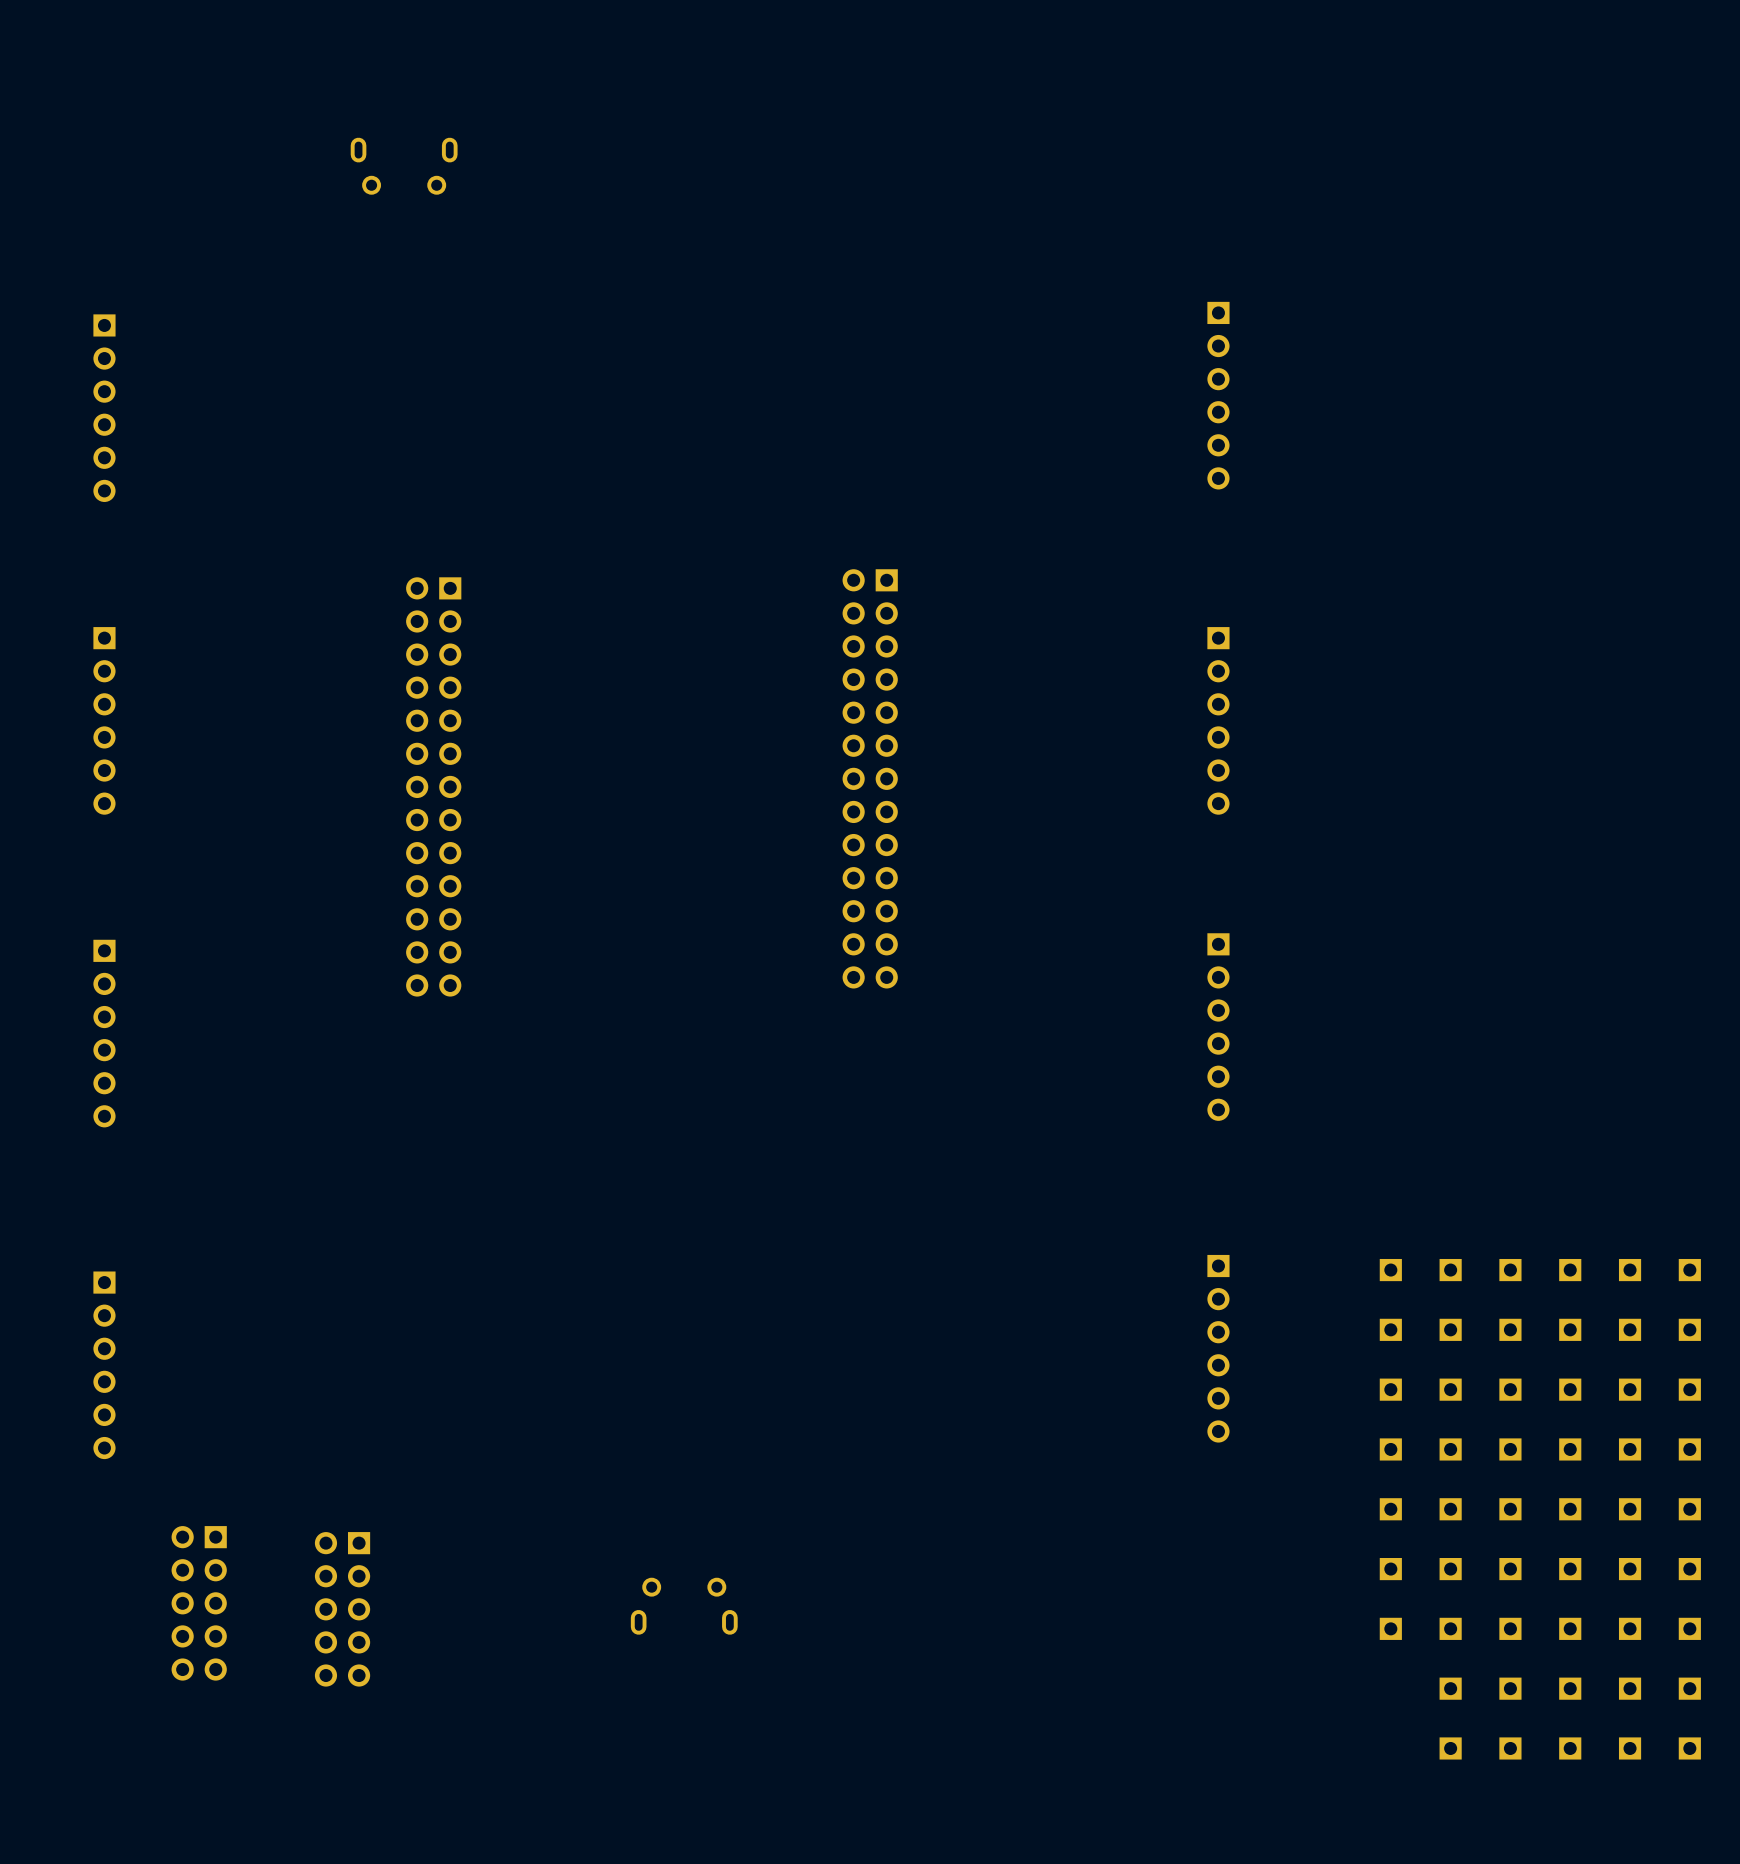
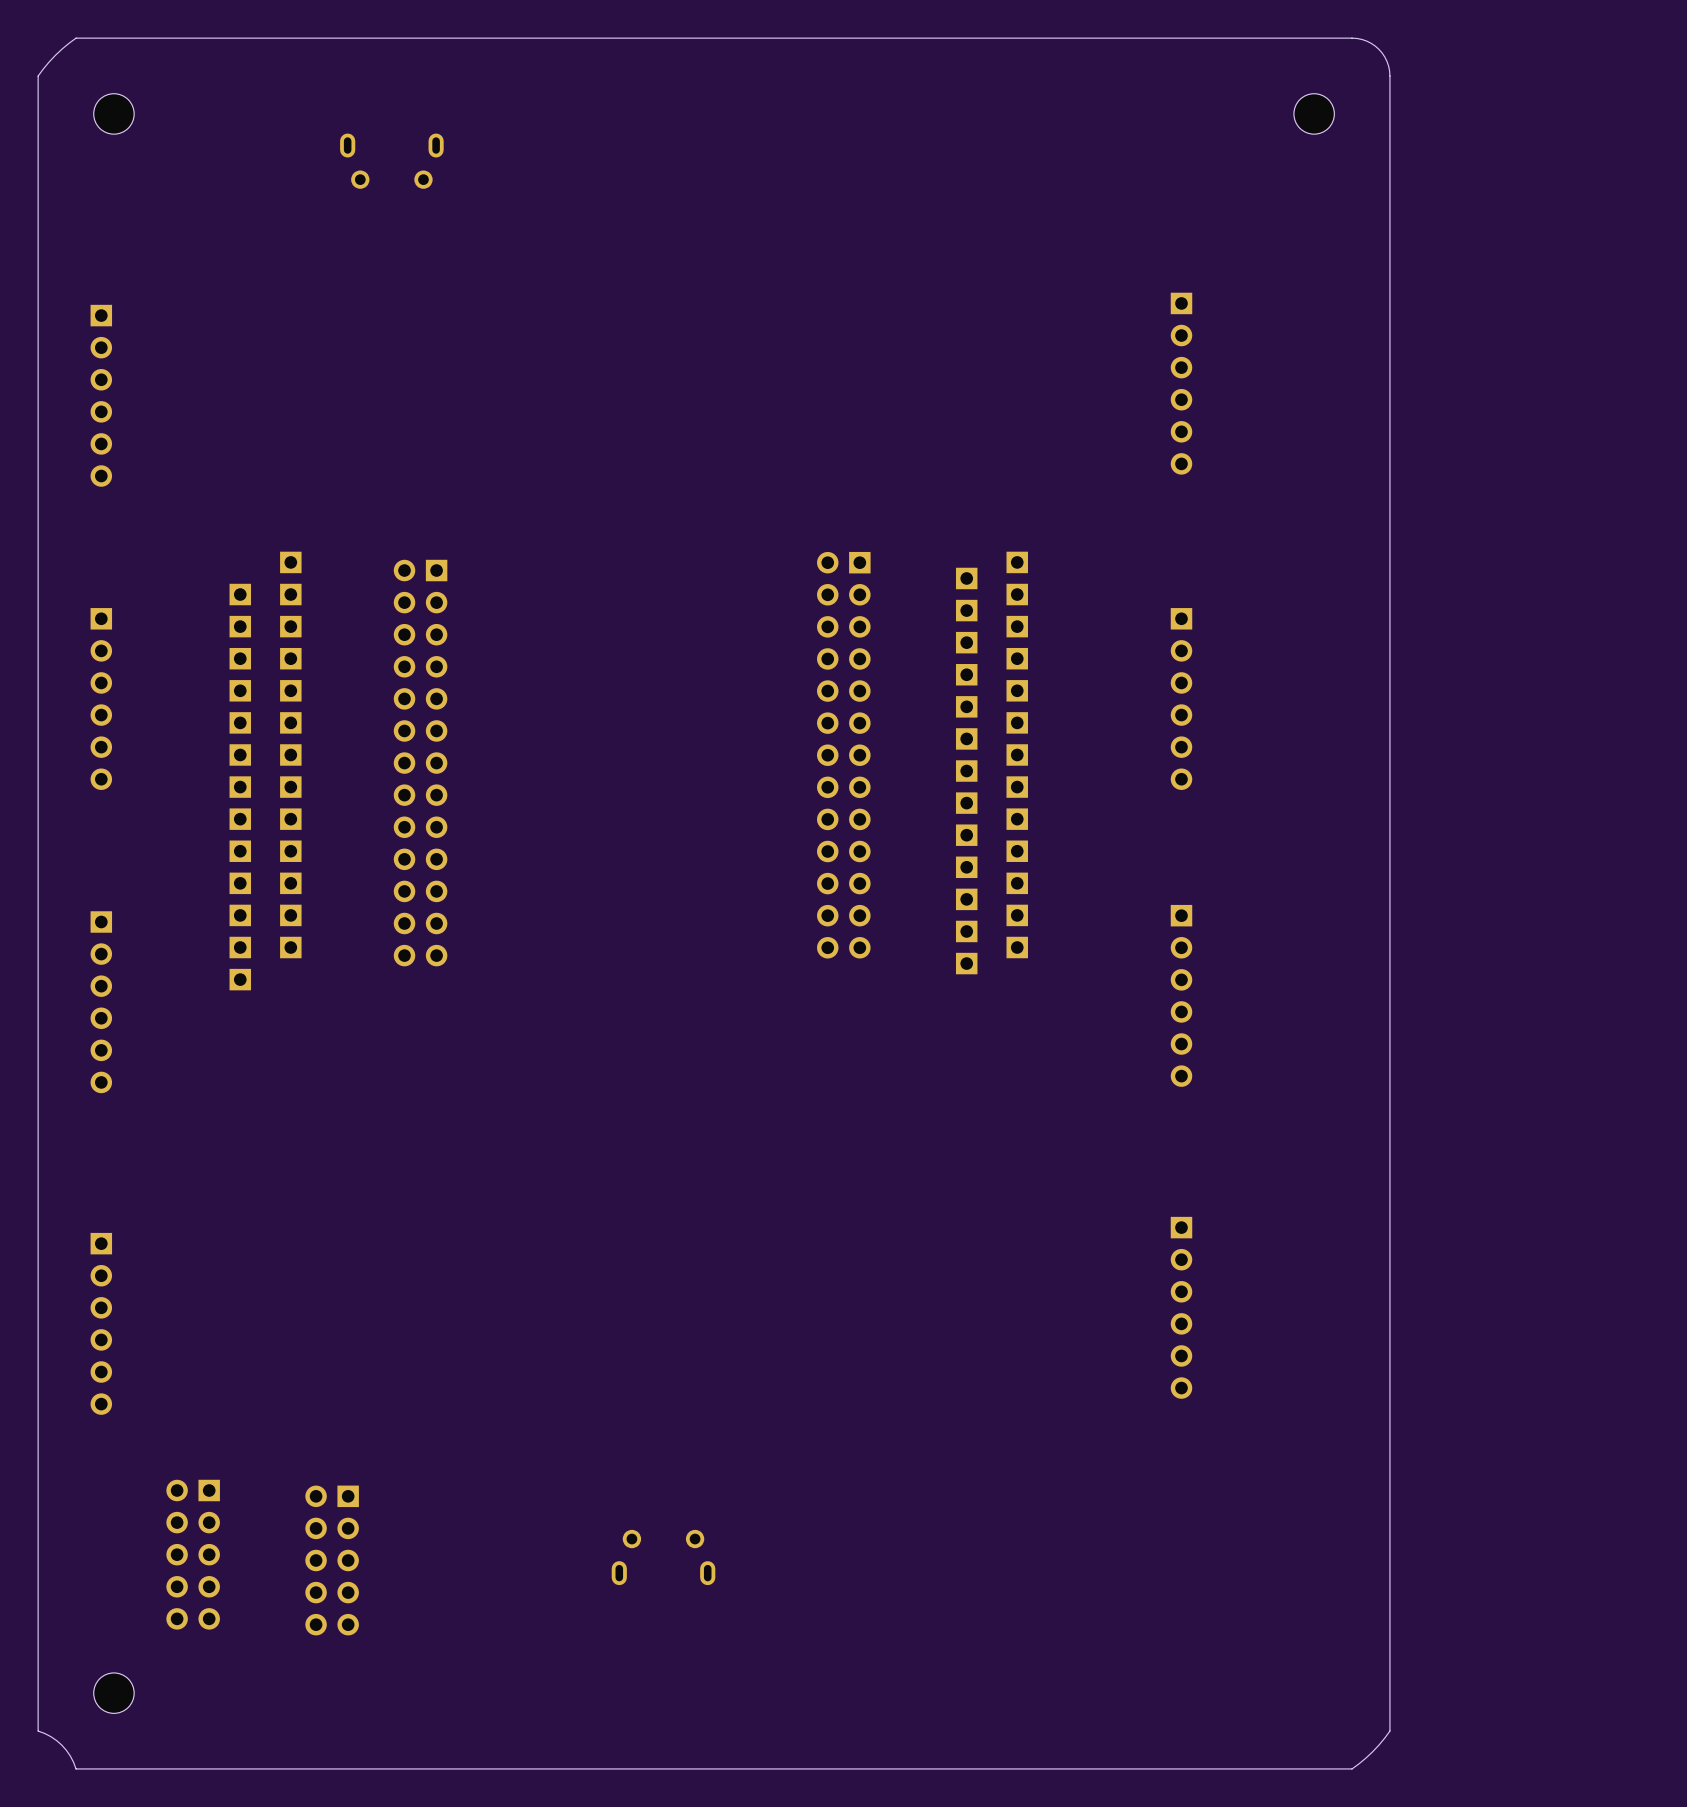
board edge: none -> (1352, 38) (76, 38) (55, 55) (43, 68) (38, 76) (38, 1731) (50, 1736) (61, 1745) (70, 1756) (76, 1768) (1352, 1768) (1372, 1751) (1384, 1738) (1389, 1731) (1389, 76) (1387, 61) (1378, 49) (1366, 41) (1352, 38)
part: none -> (113, 113)
part: none -> (1314, 113)
part: none -> (290, 562)
part: none -> (1017, 562)
part: none -> (966, 578)
part: none -> (240, 594)
part: none -> (290, 594)
part: none -> (1017, 594)
part: none -> (966, 610)
part: none -> (240, 626)
part: none -> (290, 626)
part: none -> (1017, 626)
part: none -> (966, 642)
part: none -> (240, 658)
part: none -> (290, 658)
part: none -> (1017, 658)
part: none -> (966, 674)
part: none -> (240, 690)
part: none -> (290, 690)
part: none -> (1017, 690)
part: none -> (966, 706)
part: none -> (240, 722)
part: none -> (290, 722)
part: none -> (1017, 722)
part: none -> (966, 738)
part: none -> (240, 754)
part: none -> (290, 754)
part: none -> (1017, 754)
part: none -> (966, 771)
part: none -> (240, 787)
part: none -> (290, 787)
part: none -> (1017, 787)
part: none -> (966, 803)
part: none -> (240, 819)
part: none -> (290, 819)
part: none -> (1017, 819)
part: none -> (966, 835)
part: none -> (240, 851)
part: none -> (290, 851)
part: none -> (1017, 851)
part: none -> (966, 867)
part: none -> (240, 883)
part: none -> (290, 883)
part: none -> (1017, 883)
part: none -> (966, 899)
part: none -> (240, 915)
part: none -> (290, 915)
part: none -> (1017, 915)
part: none -> (966, 931)
part: none -> (240, 947)
part: none -> (290, 947)
part: none -> (1017, 947)
part: none -> (966, 963)
part: none -> (240, 979)
part: (1390, 1270) -> none
part: (1450, 1270) -> none
part: (1510, 1270) -> none
part: (1570, 1270) -> none
part: (1630, 1270) -> none
part: (1689, 1270) -> none
part: (1390, 1329) -> none
part: (1450, 1329) -> none
part: (1510, 1329) -> none
part: (1570, 1329) -> none
part: (1630, 1329) -> none
part: (1689, 1329) -> none
part: (1390, 1389) -> none
part: (1450, 1389) -> none
part: (1510, 1389) -> none
part: (1570, 1389) -> none
part: (1630, 1389) -> none
part: (1689, 1389) -> none
part: (1390, 1449) -> none
part: (1450, 1449) -> none
part: (1510, 1449) -> none
part: (1570, 1449) -> none
part: (1630, 1449) -> none
part: (1689, 1449) -> none
part: (1390, 1509) -> none
part: (1450, 1509) -> none
part: (1510, 1509) -> none
part: (1570, 1509) -> none
part: (1630, 1509) -> none
part: (1689, 1509) -> none
part: (1390, 1569) -> none
part: (1450, 1569) -> none
part: (1510, 1569) -> none
part: (1570, 1569) -> none
part: (1630, 1569) -> none
part: (1689, 1569) -> none
part: (1390, 1628) -> none
part: (1450, 1628) -> none
part: (1510, 1628) -> none
part: (1570, 1628) -> none
part: (1630, 1628) -> none
part: (1689, 1628) -> none
part: (1450, 1688) -> none
part: (1510, 1688) -> none
part: (1570, 1688) -> none
part: (1630, 1688) -> none
part: (1689, 1688) -> none
part: none -> (113, 1693)
part: (1450, 1748) -> none
part: (1510, 1748) -> none
part: (1570, 1748) -> none
part: (1630, 1748) -> none
part: (1689, 1748) -> none

